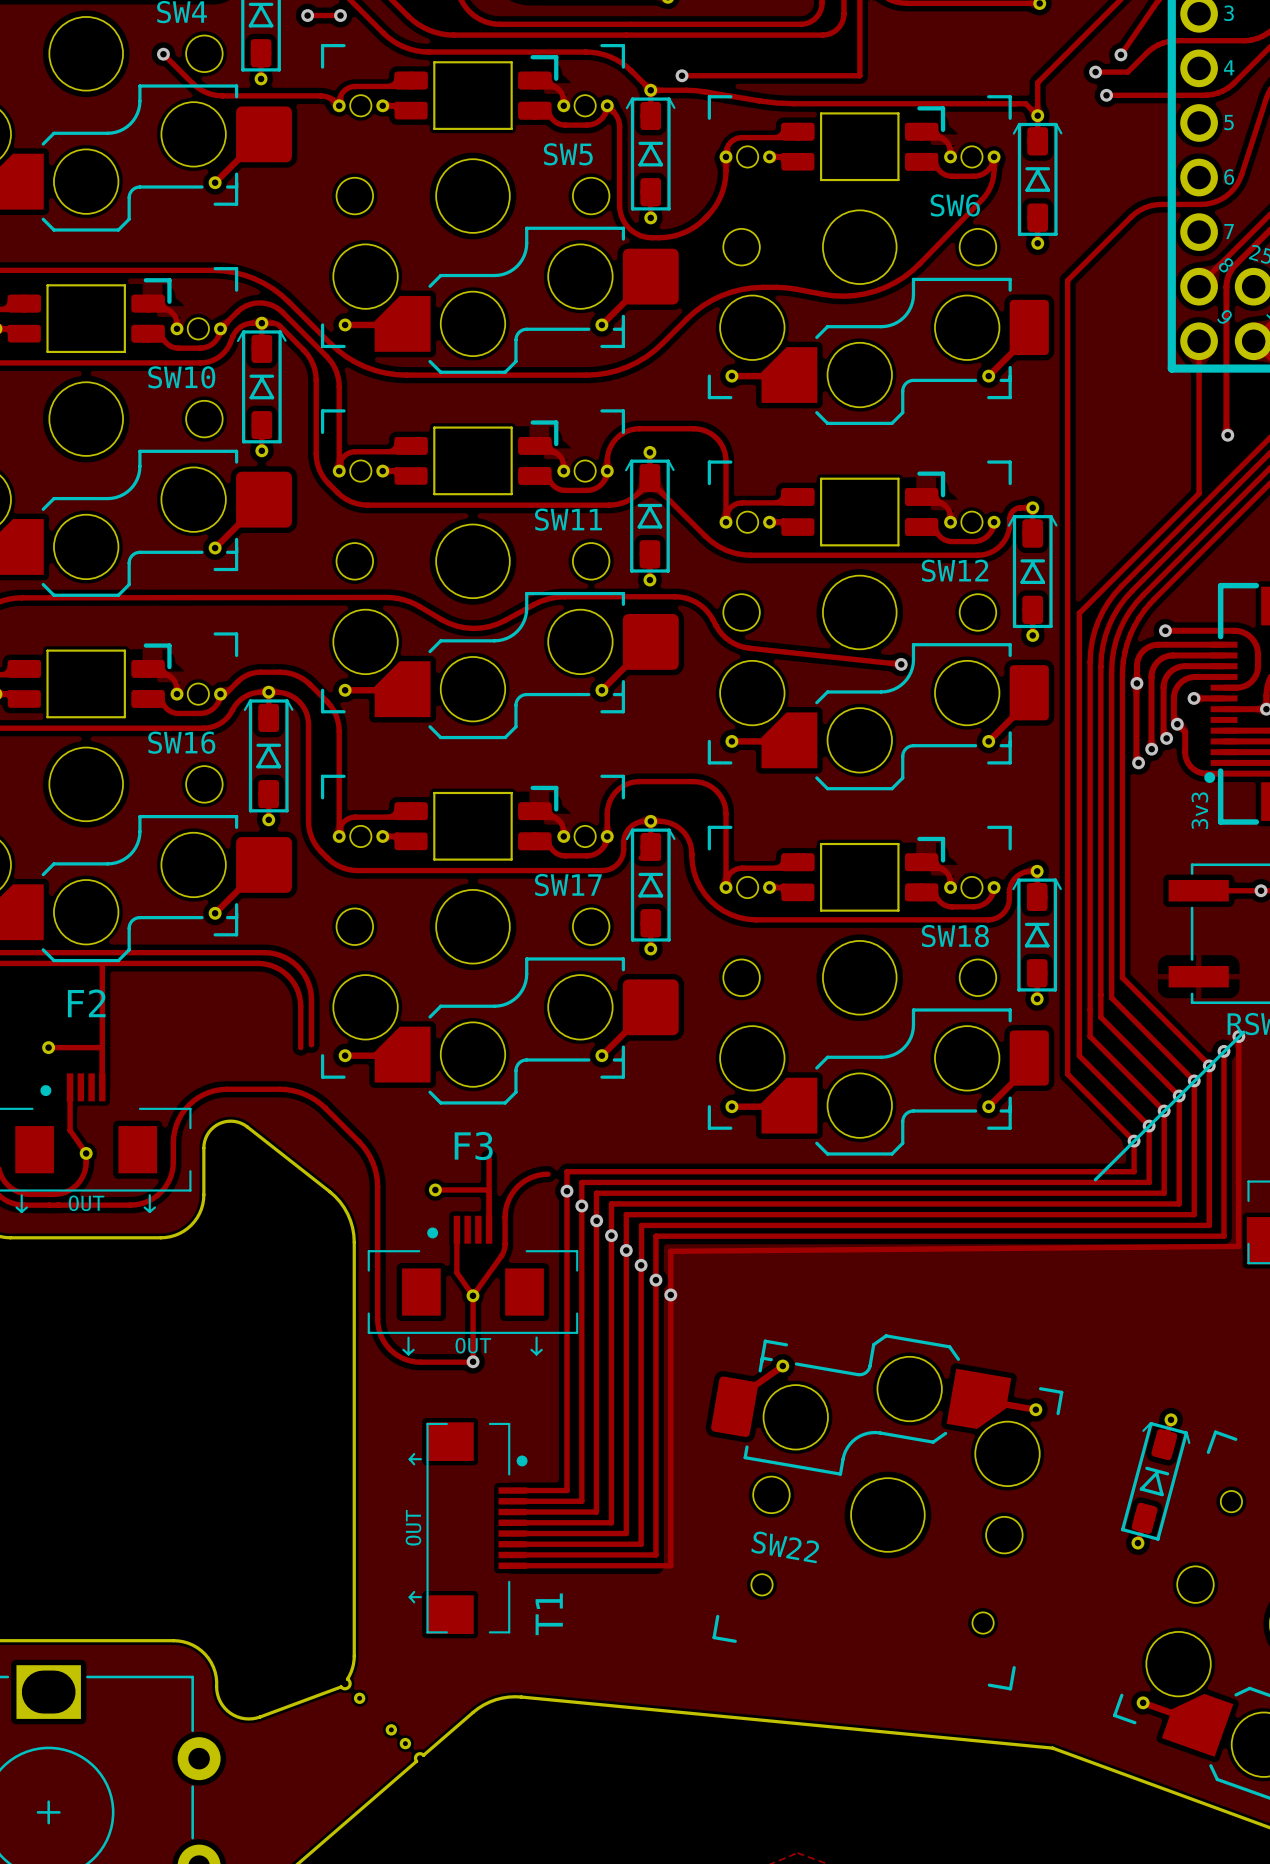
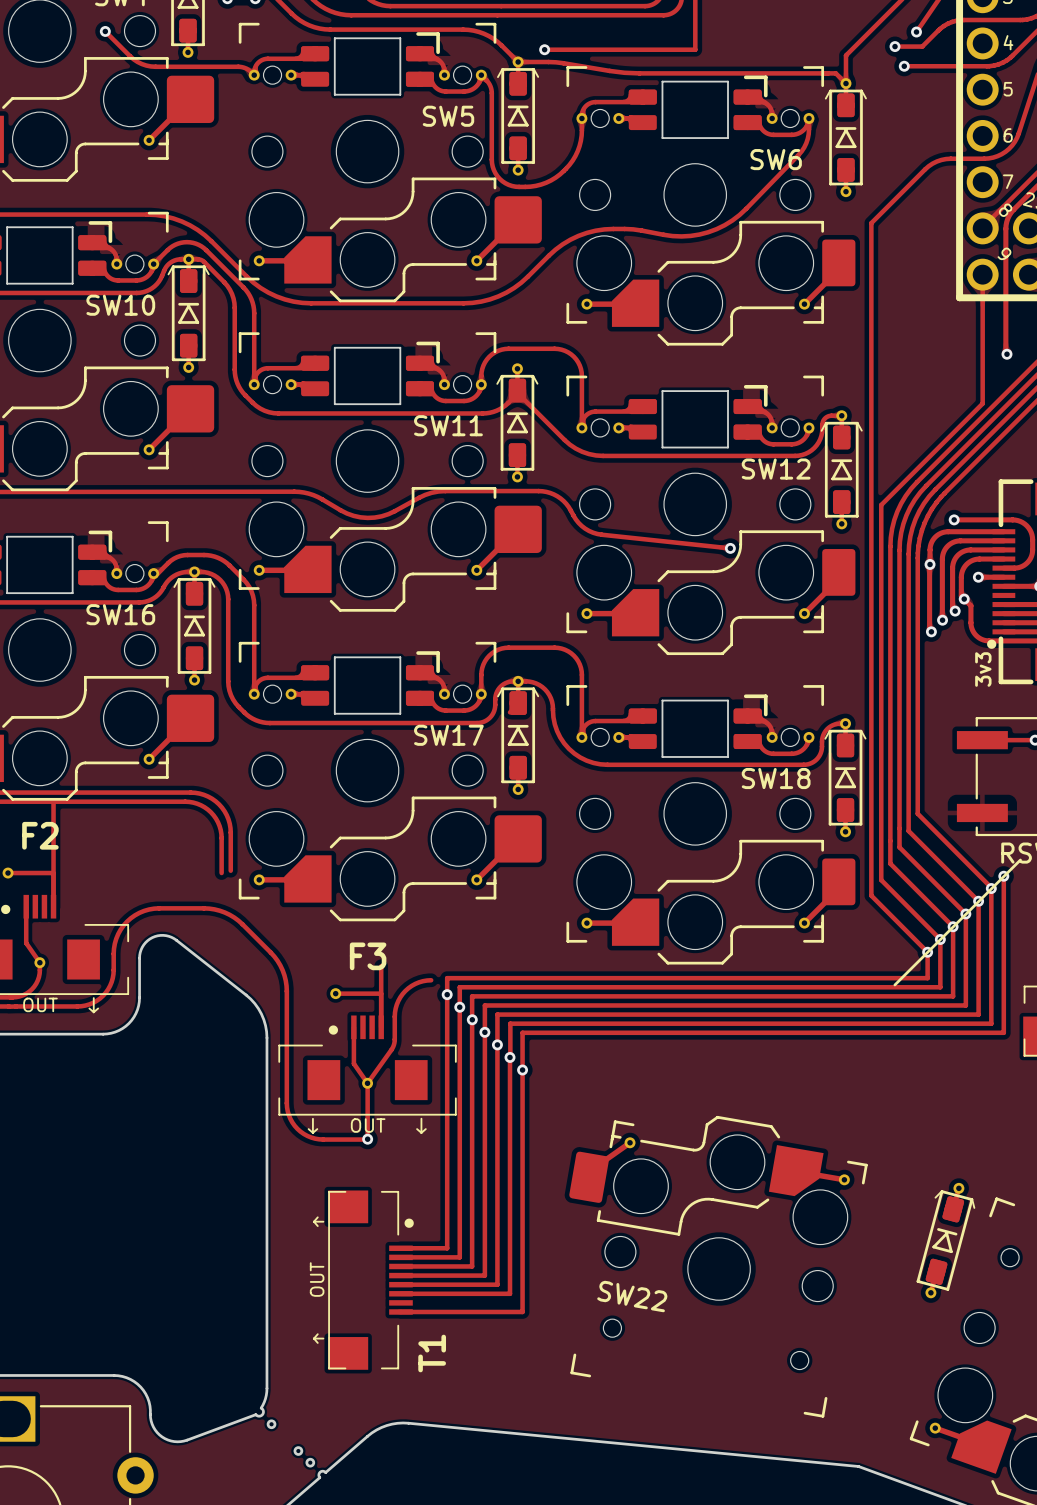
track: (1238, 1036) (1238, 1246) (670, 1251) (670, 1565) (655, 1565) -> none
via: (1238, 1036) -> none
via: (670, 1294) -> none
track: (512, 1554) (655, 1554) -> (522, 1311) (522, 1302)

